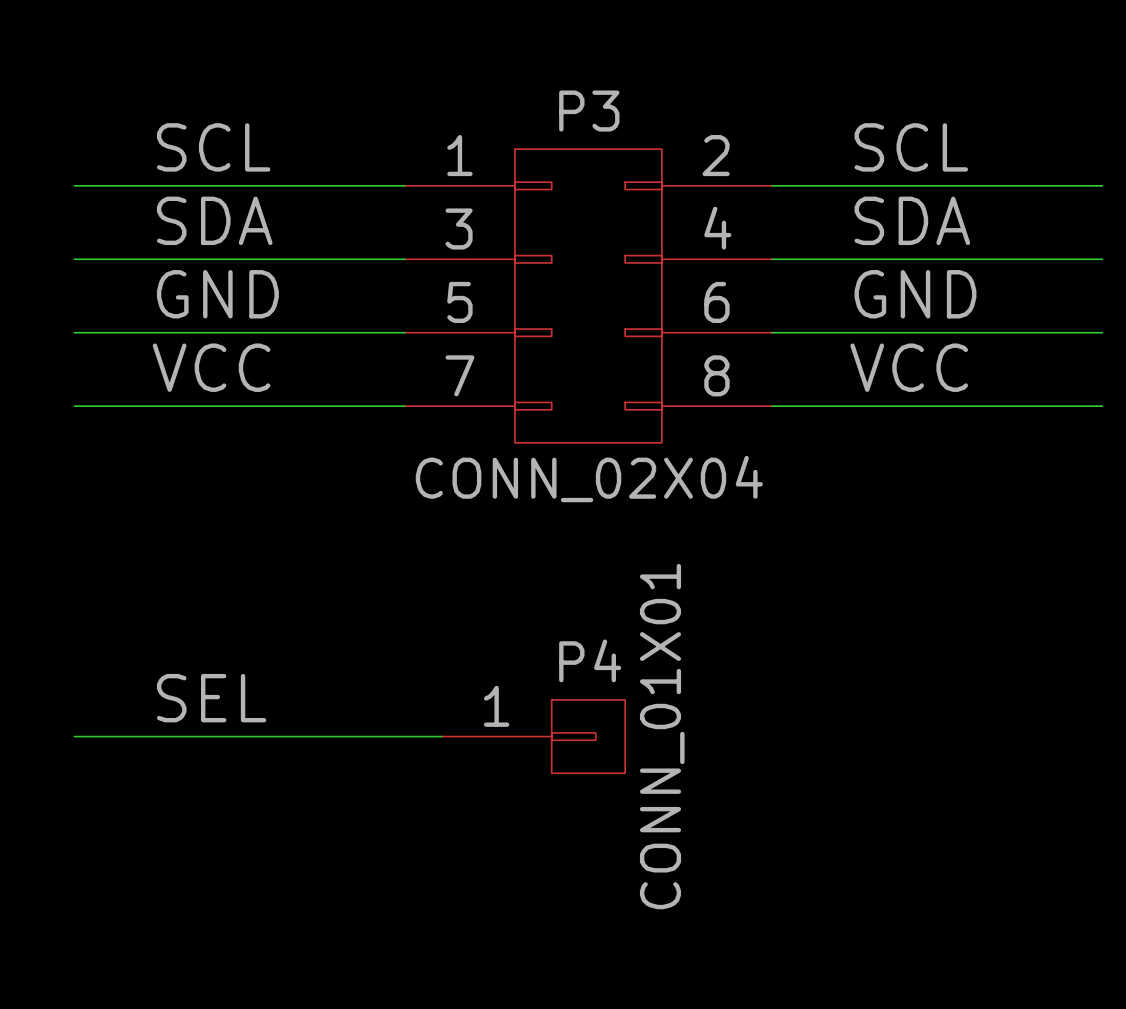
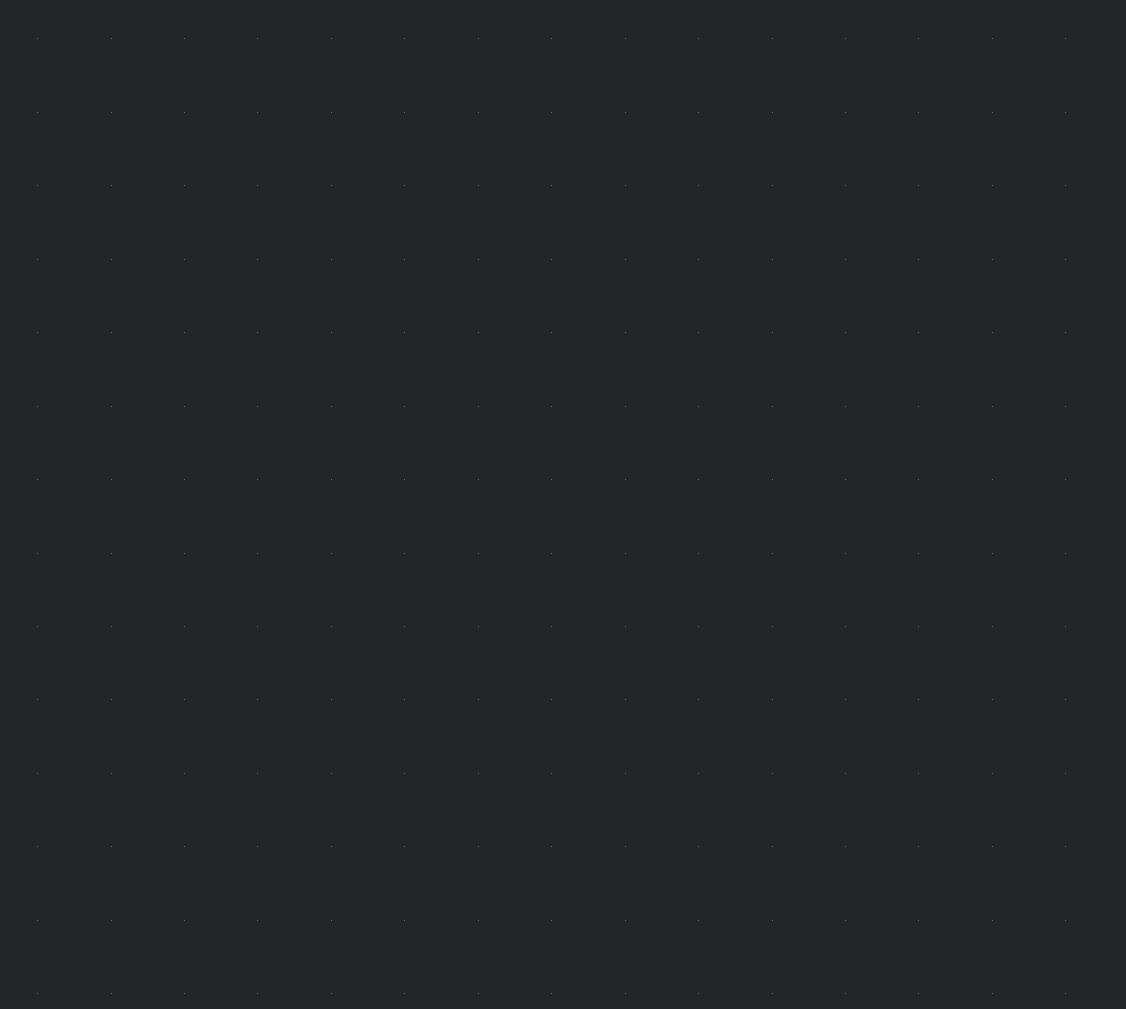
label: SCL (213, 147) -> none
label: SCL (911, 147) -> none
wire: (74, 185) (404, 185) -> none
wire: (772, 185) (1102, 185) -> none
label: SDA (214, 220) -> none
label: SDA (912, 220) -> none
wire: (74, 259) (404, 259) -> none
wire: (772, 259) (1102, 259) -> none
label: GND (217, 294) -> none
label: GND (915, 294) -> none
P3: CONN_02X04 (588, 295) -> none
wire: (74, 332) (404, 332) -> none
wire: (772, 332) (1102, 332) -> none
label: VCC (211, 367) -> none
label: VCC (909, 367) -> none
wire: (74, 406) (404, 406) -> none
wire: (772, 406) (1102, 406) -> none
label: SEL (211, 698) -> none
wire: (74, 736) (441, 736) -> none
P4: CONN_01X01 (533, 736) -> none

